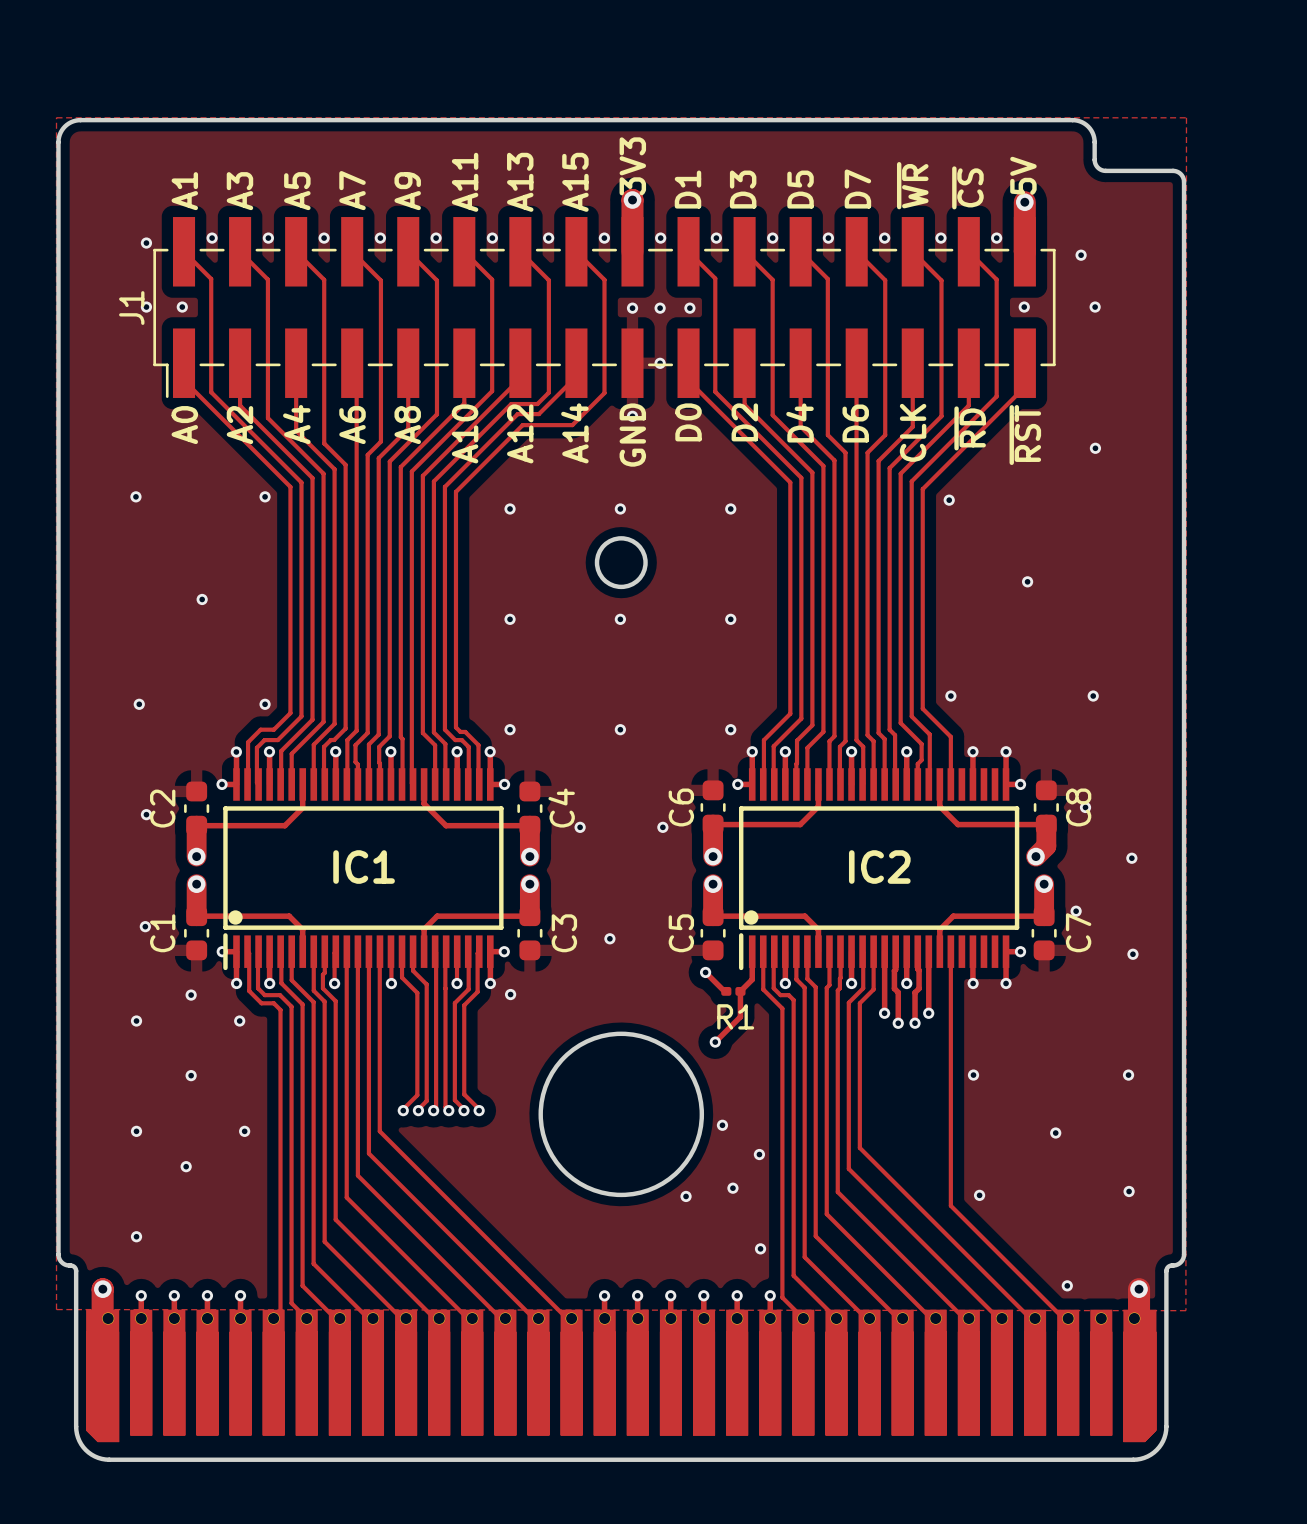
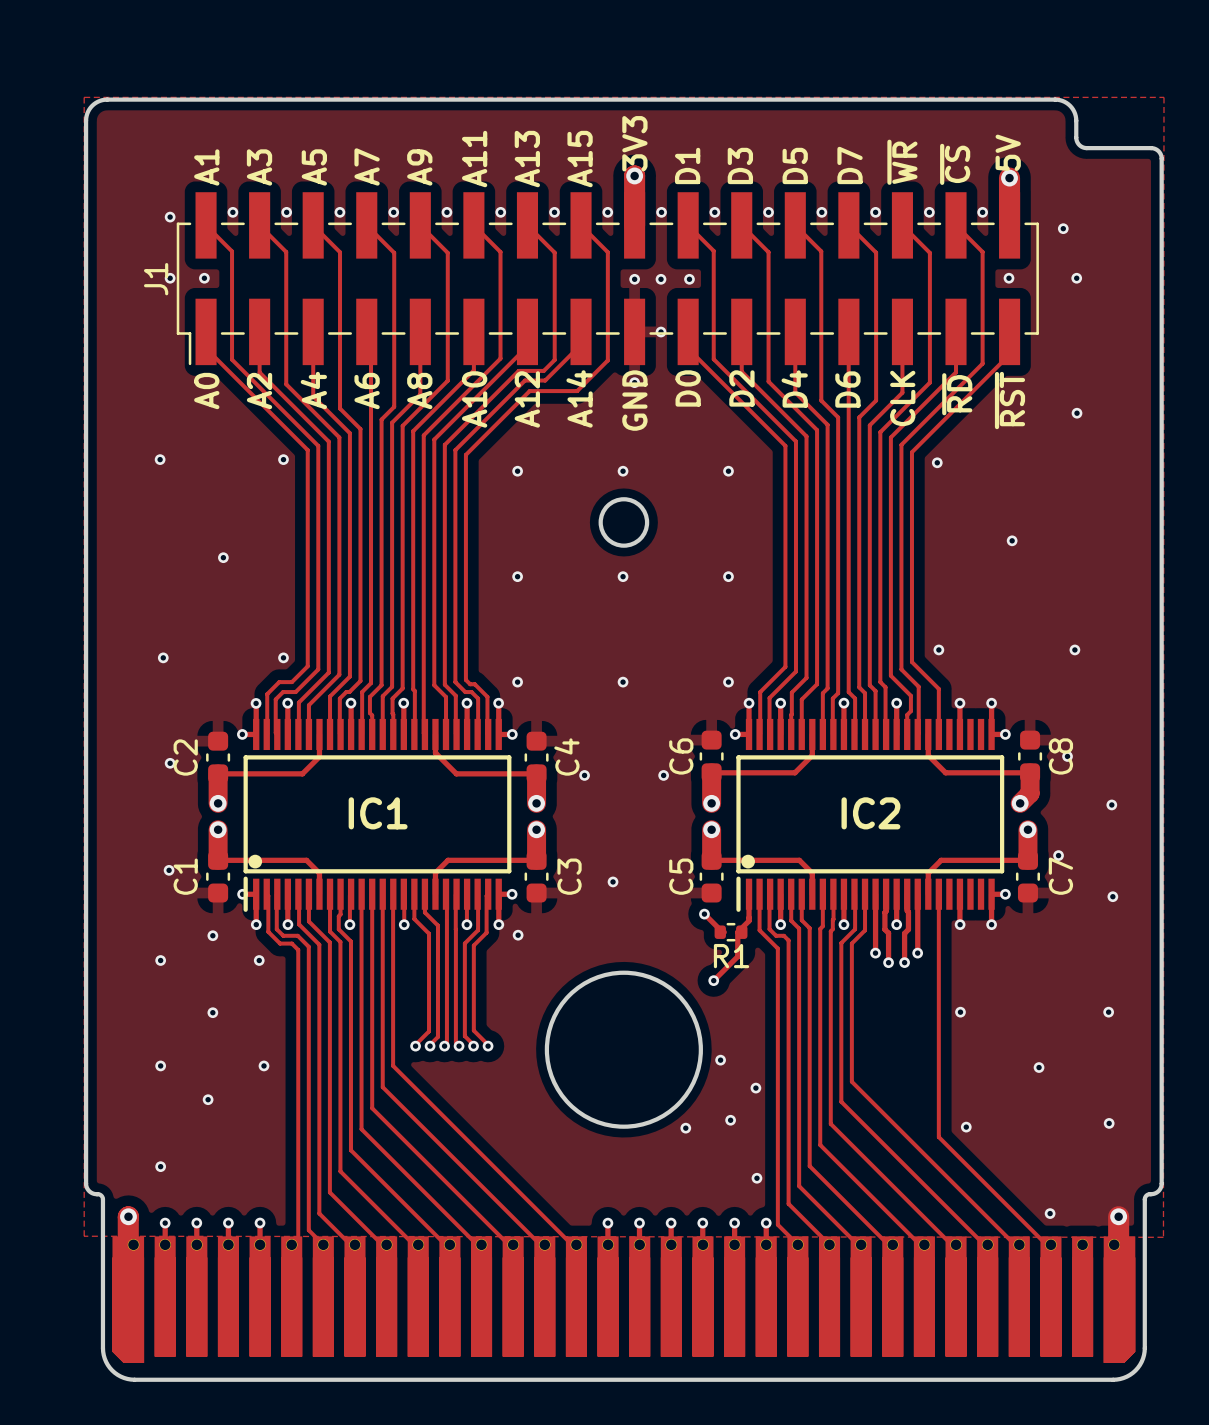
R1 footprint: [721, 986, 746, 996] -> [714, 922, 748, 942]

